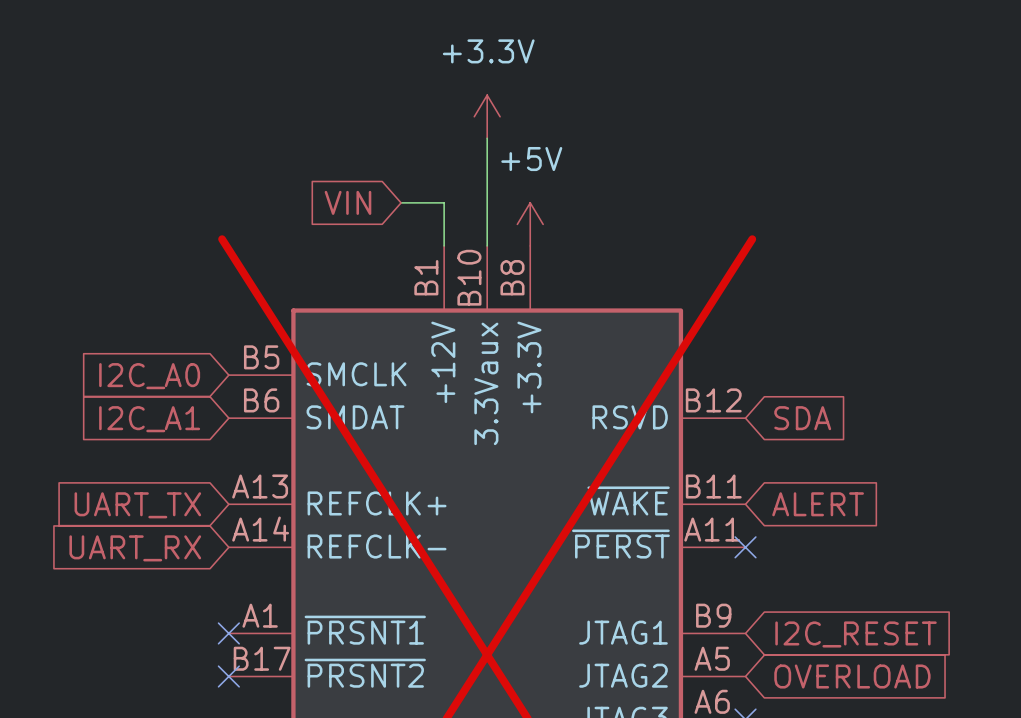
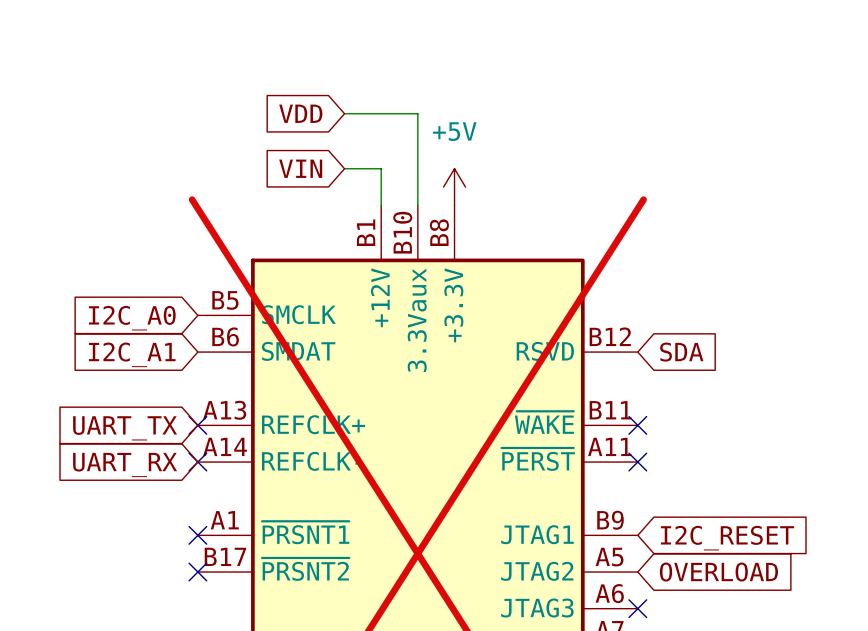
power symbol: +3.3V (487, 116) -> none
global label: none -> VDD (300, 113)
wire: none -> (344, 113) (417, 113)
no-connect mark: none -> (197, 425)
no-connect mark: none -> (637, 425)
global label: ALERT (818, 504) -> none
no-connect mark: none -> (197, 462)

